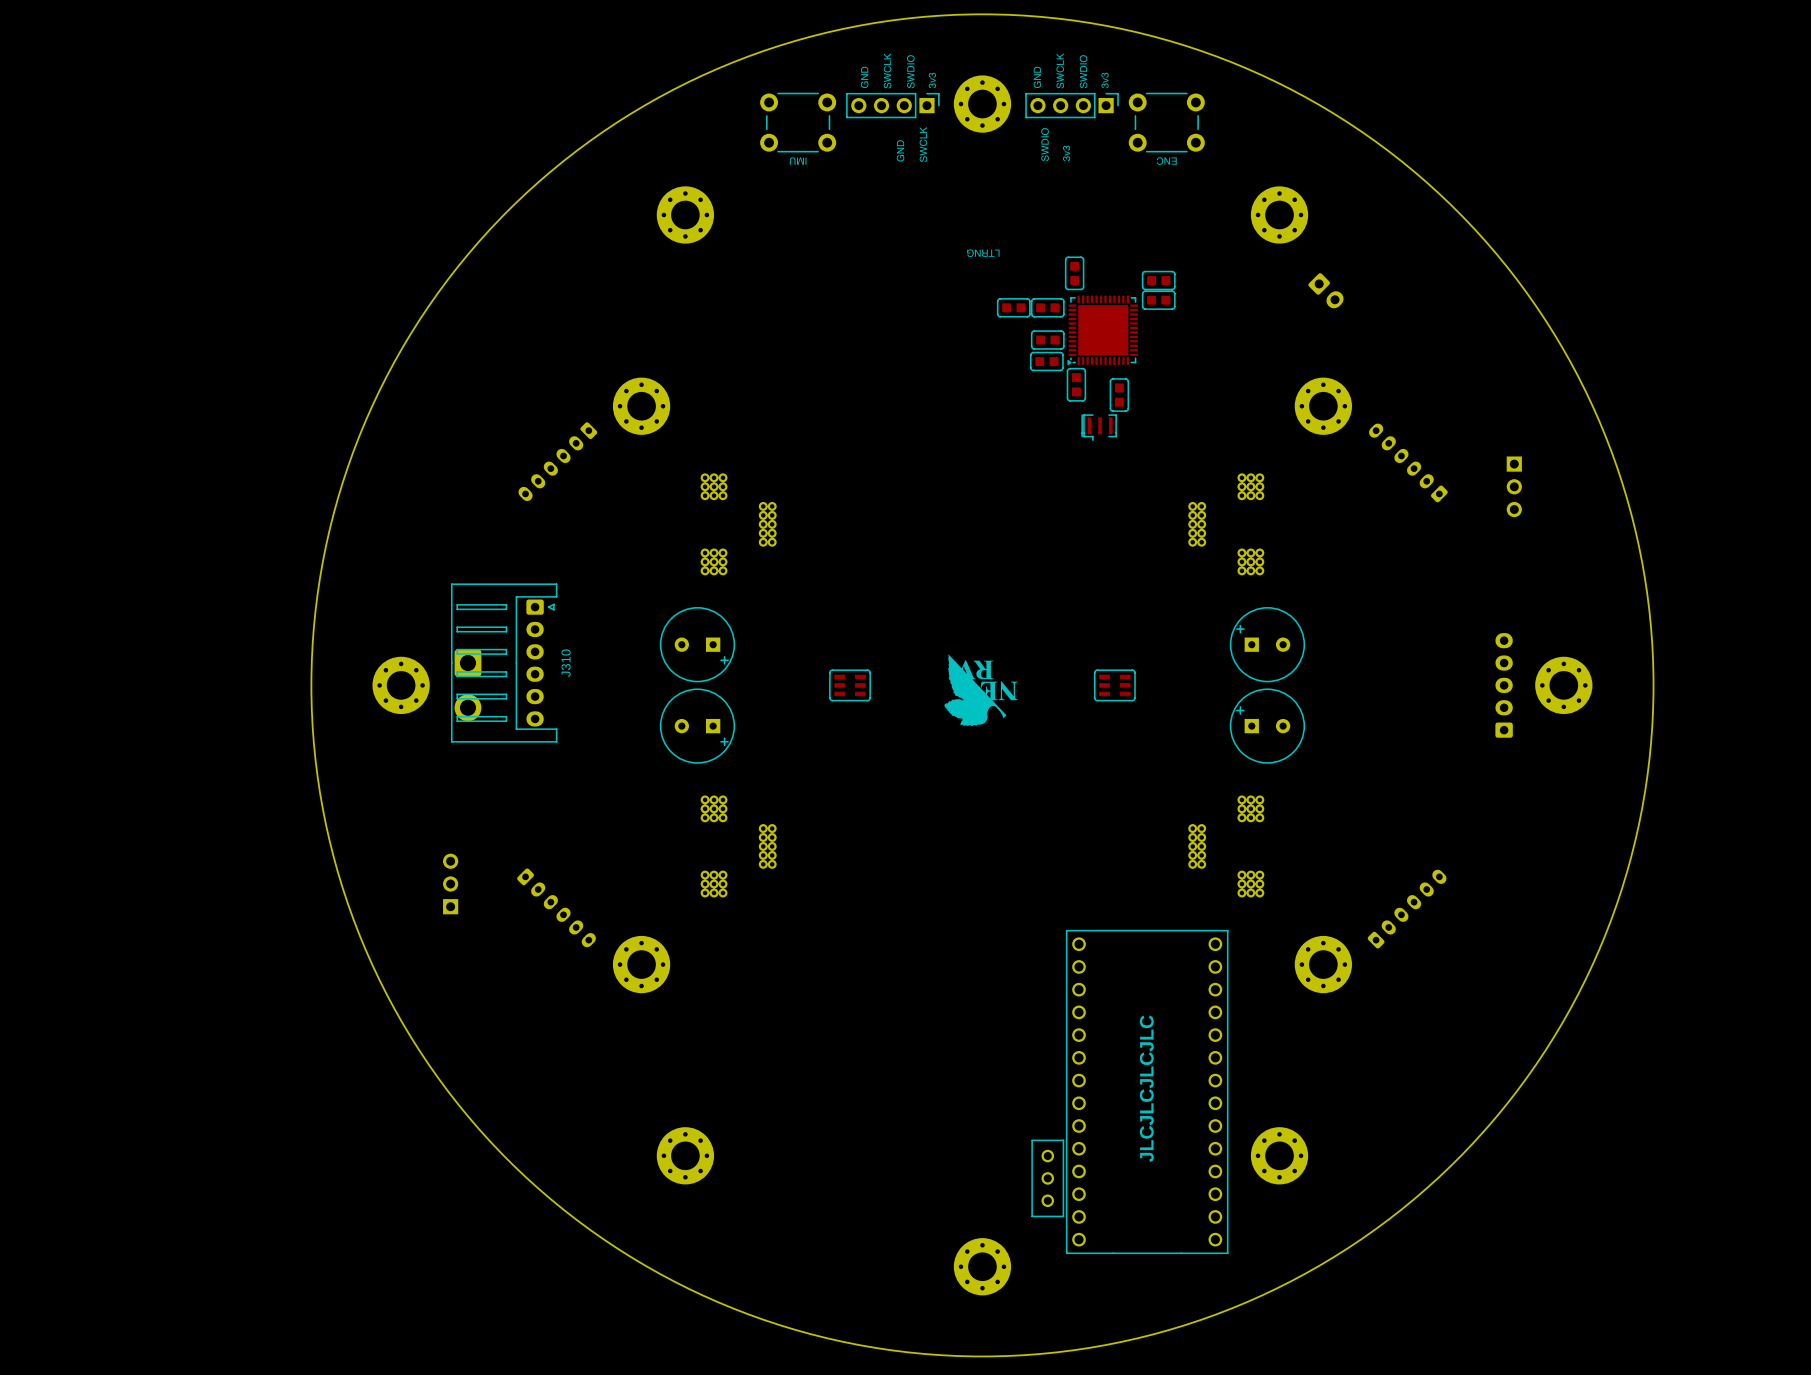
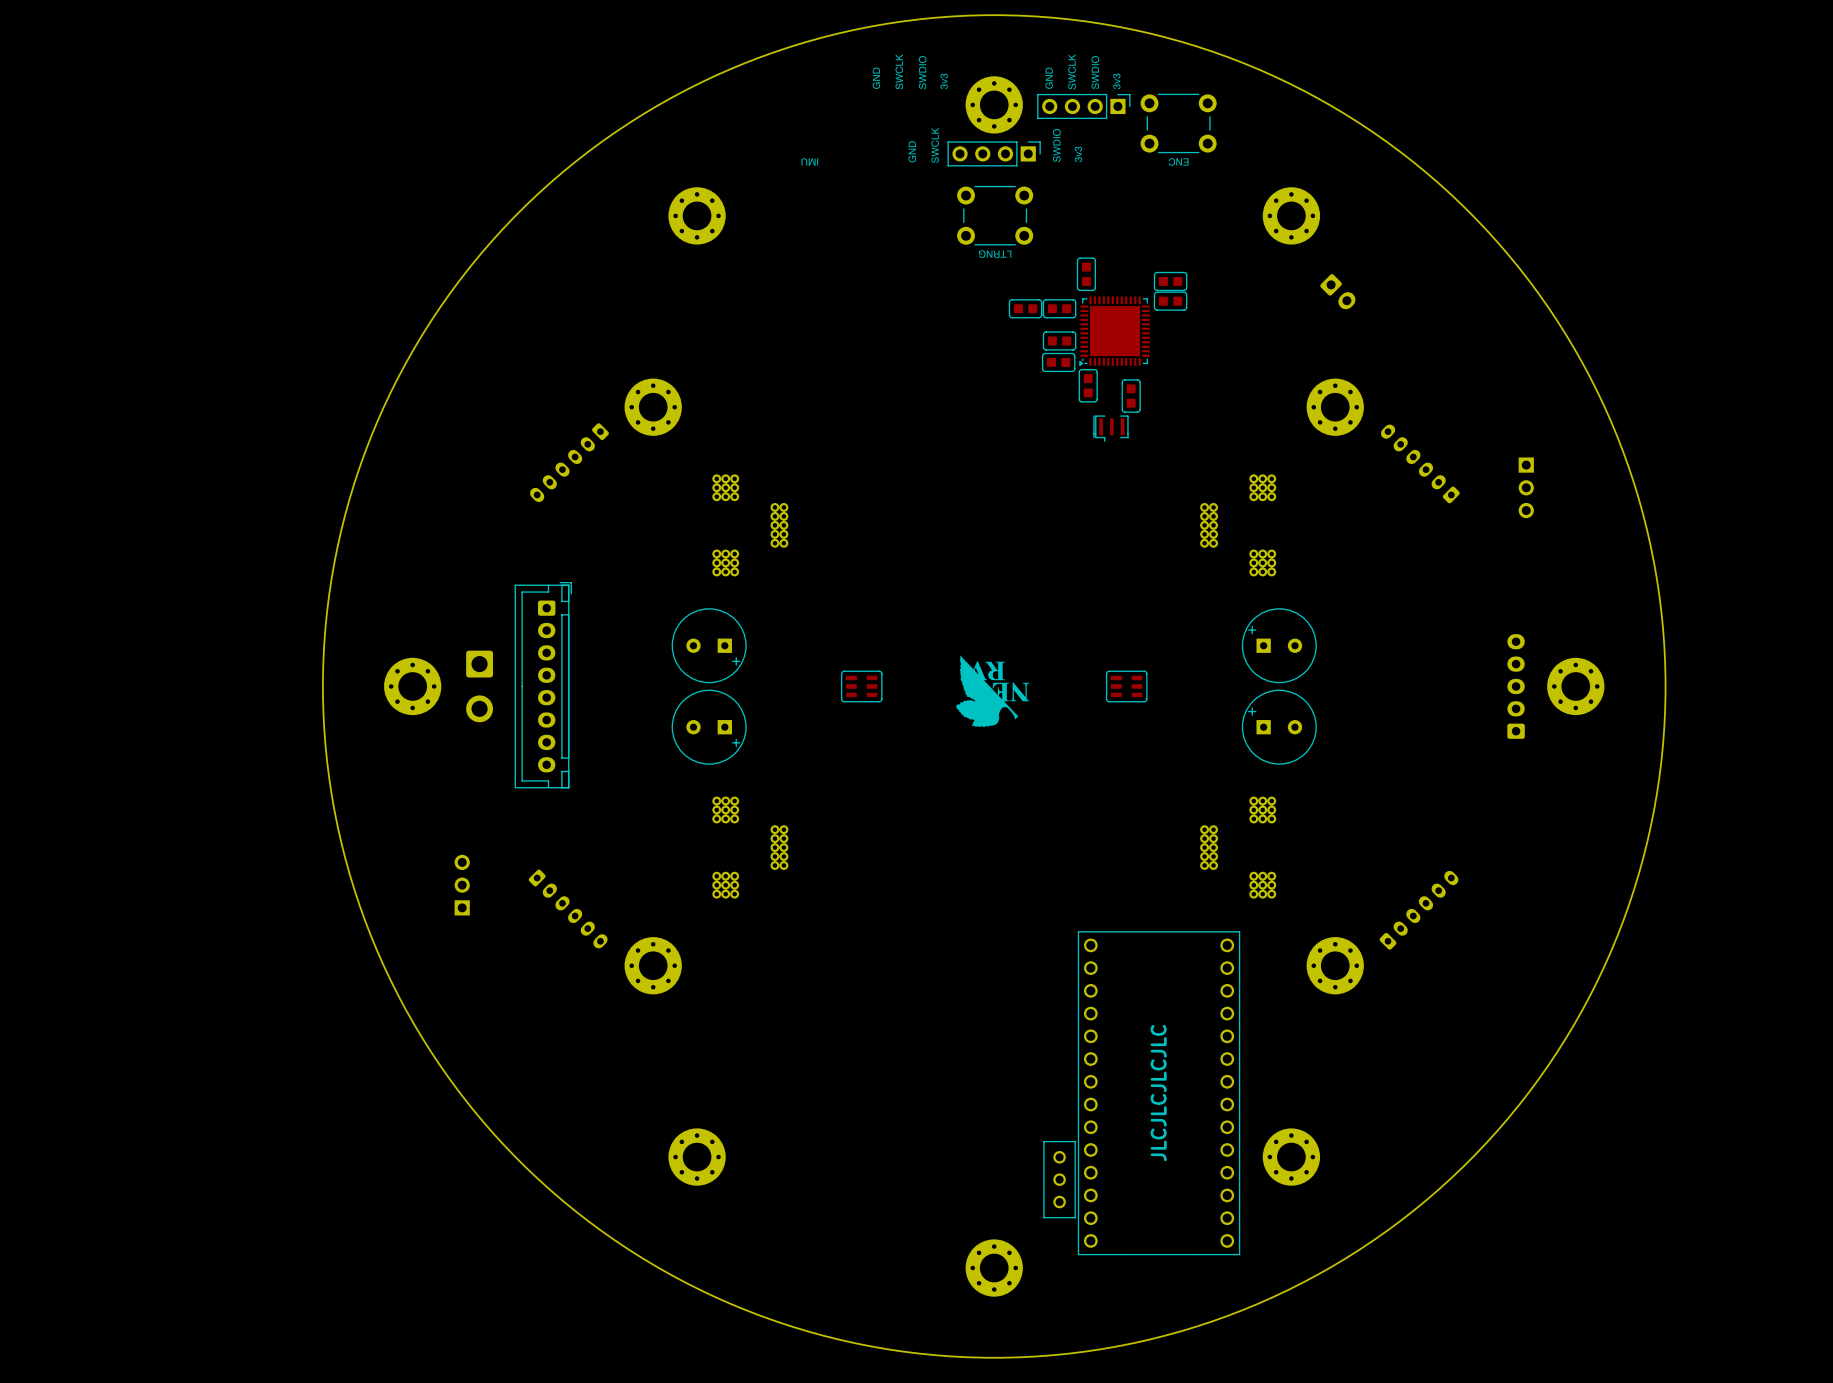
part position: (892, 105) -> (994, 153)
part position: (798, 122) -> (995, 215)
J310: (504, 663) -> none
part: none -> (543, 685)

